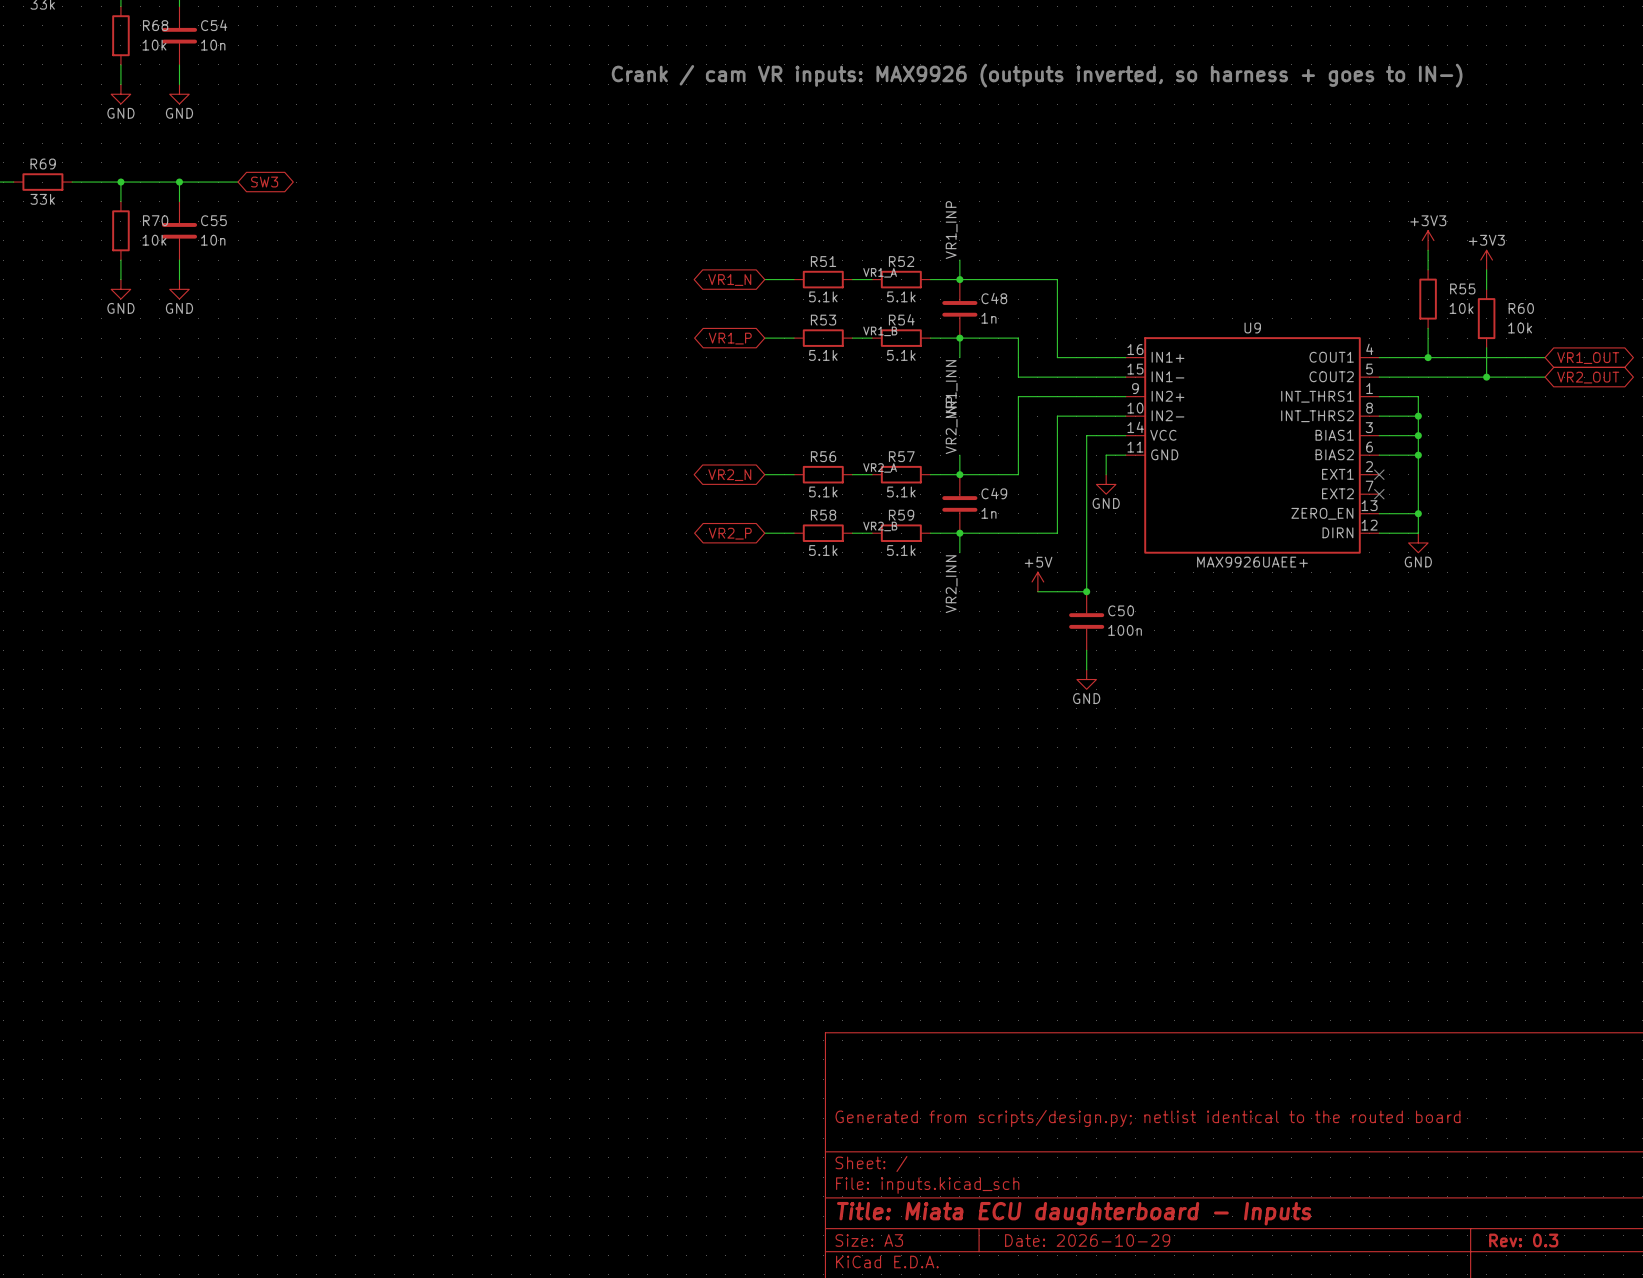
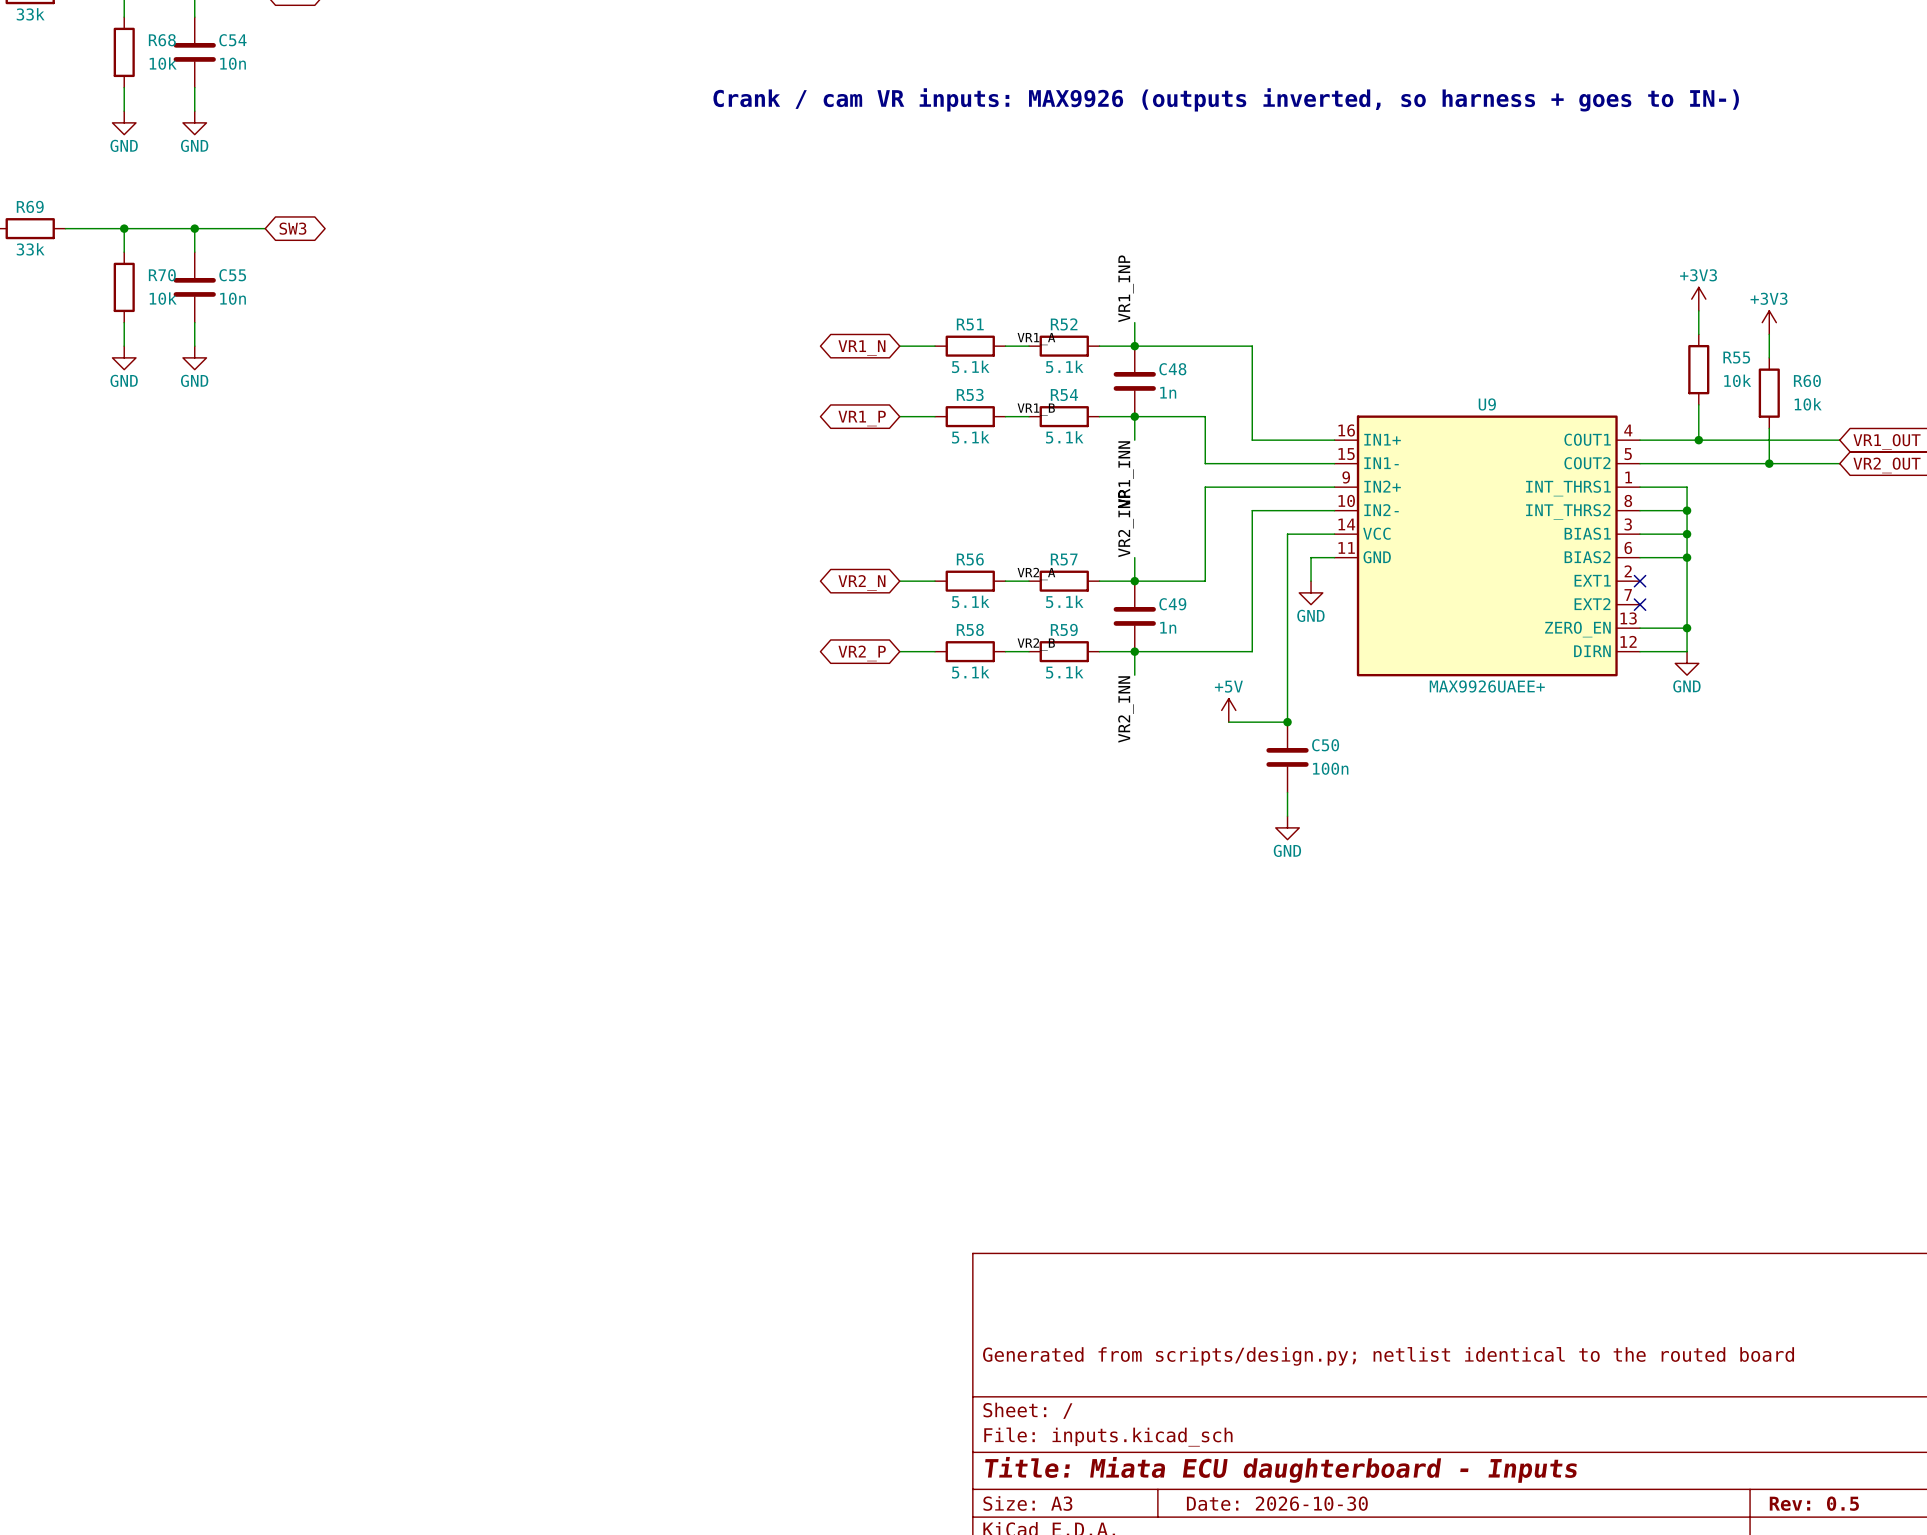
title block: Date: 2026-10-29 (1087, 1240) -> Date: 2026-10-30 (1277, 1503)
title block: Rev: 0.3 (1523, 1240) -> Rev: 0.5 (1814, 1503)

